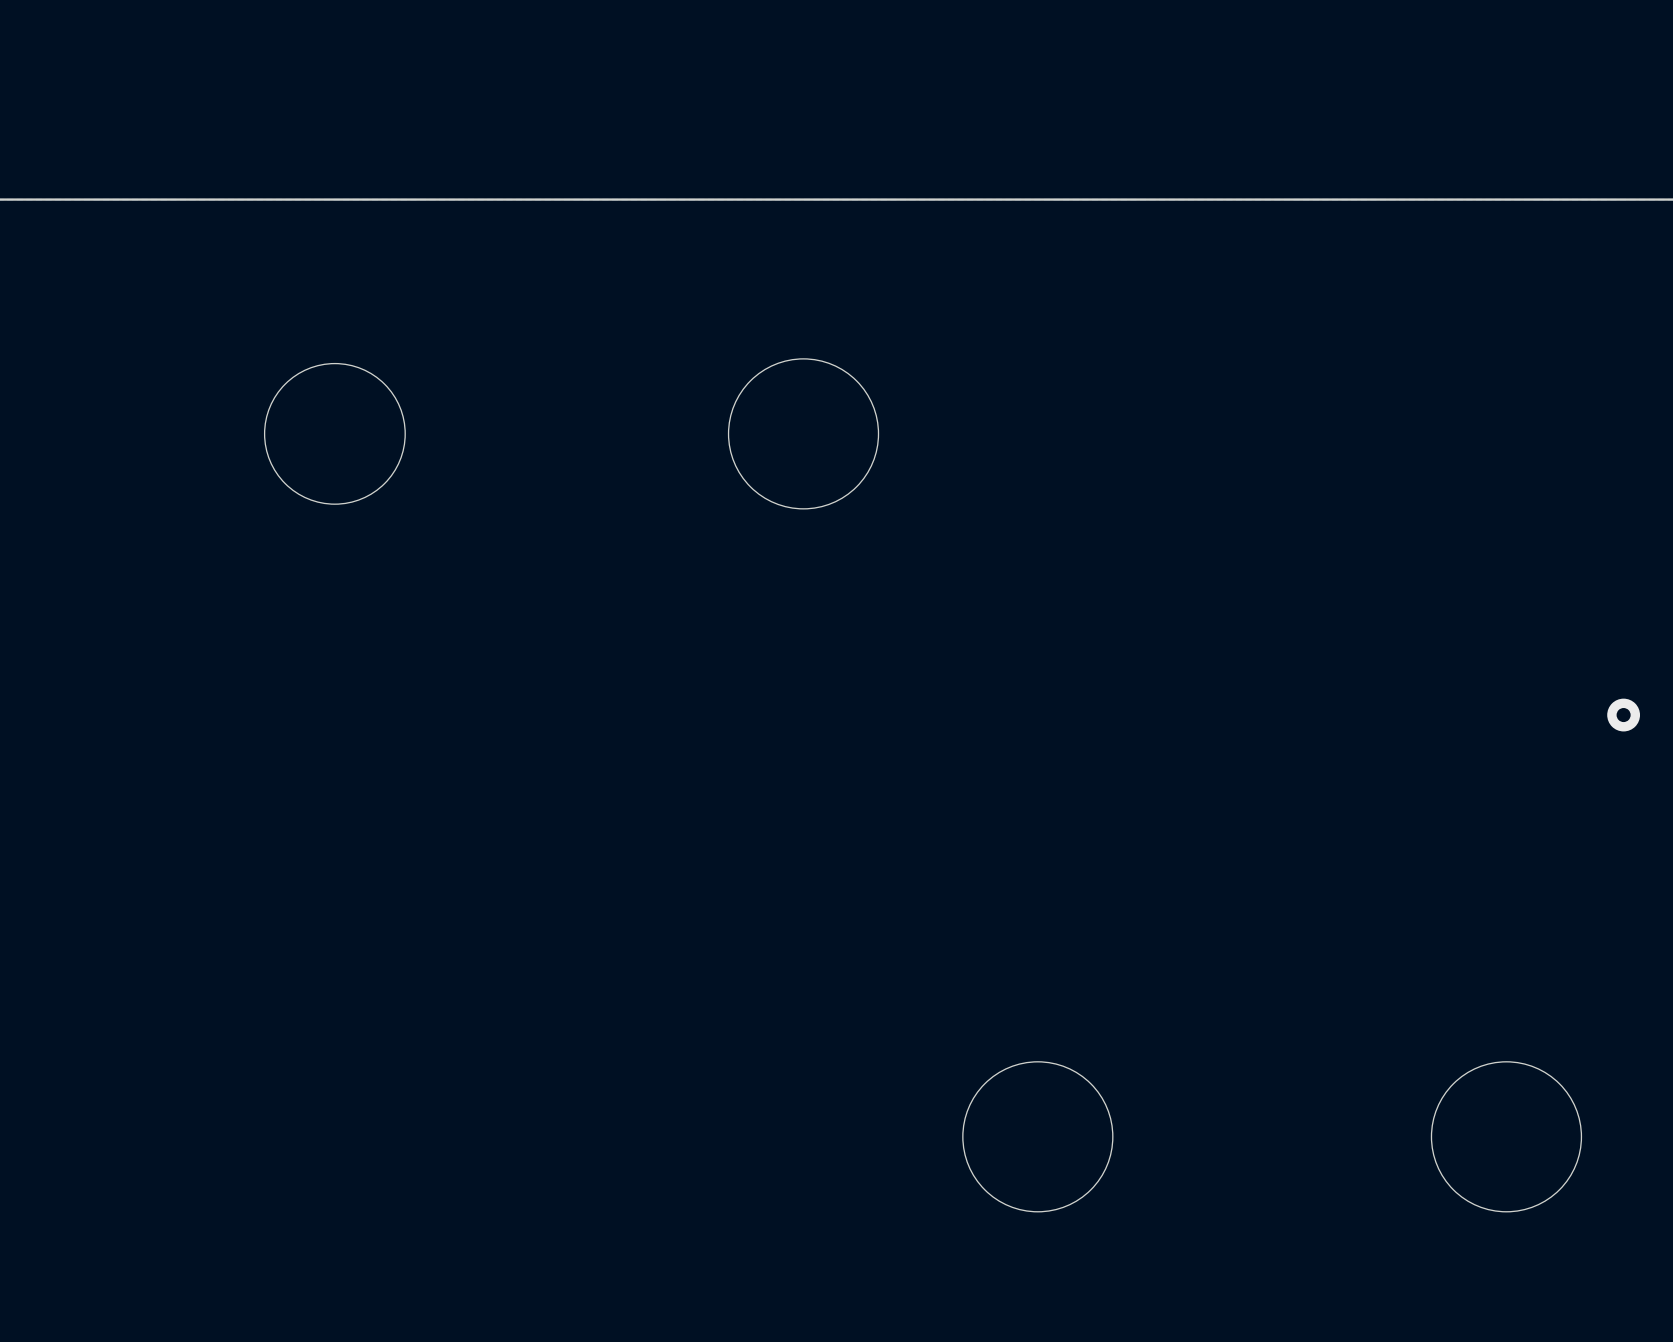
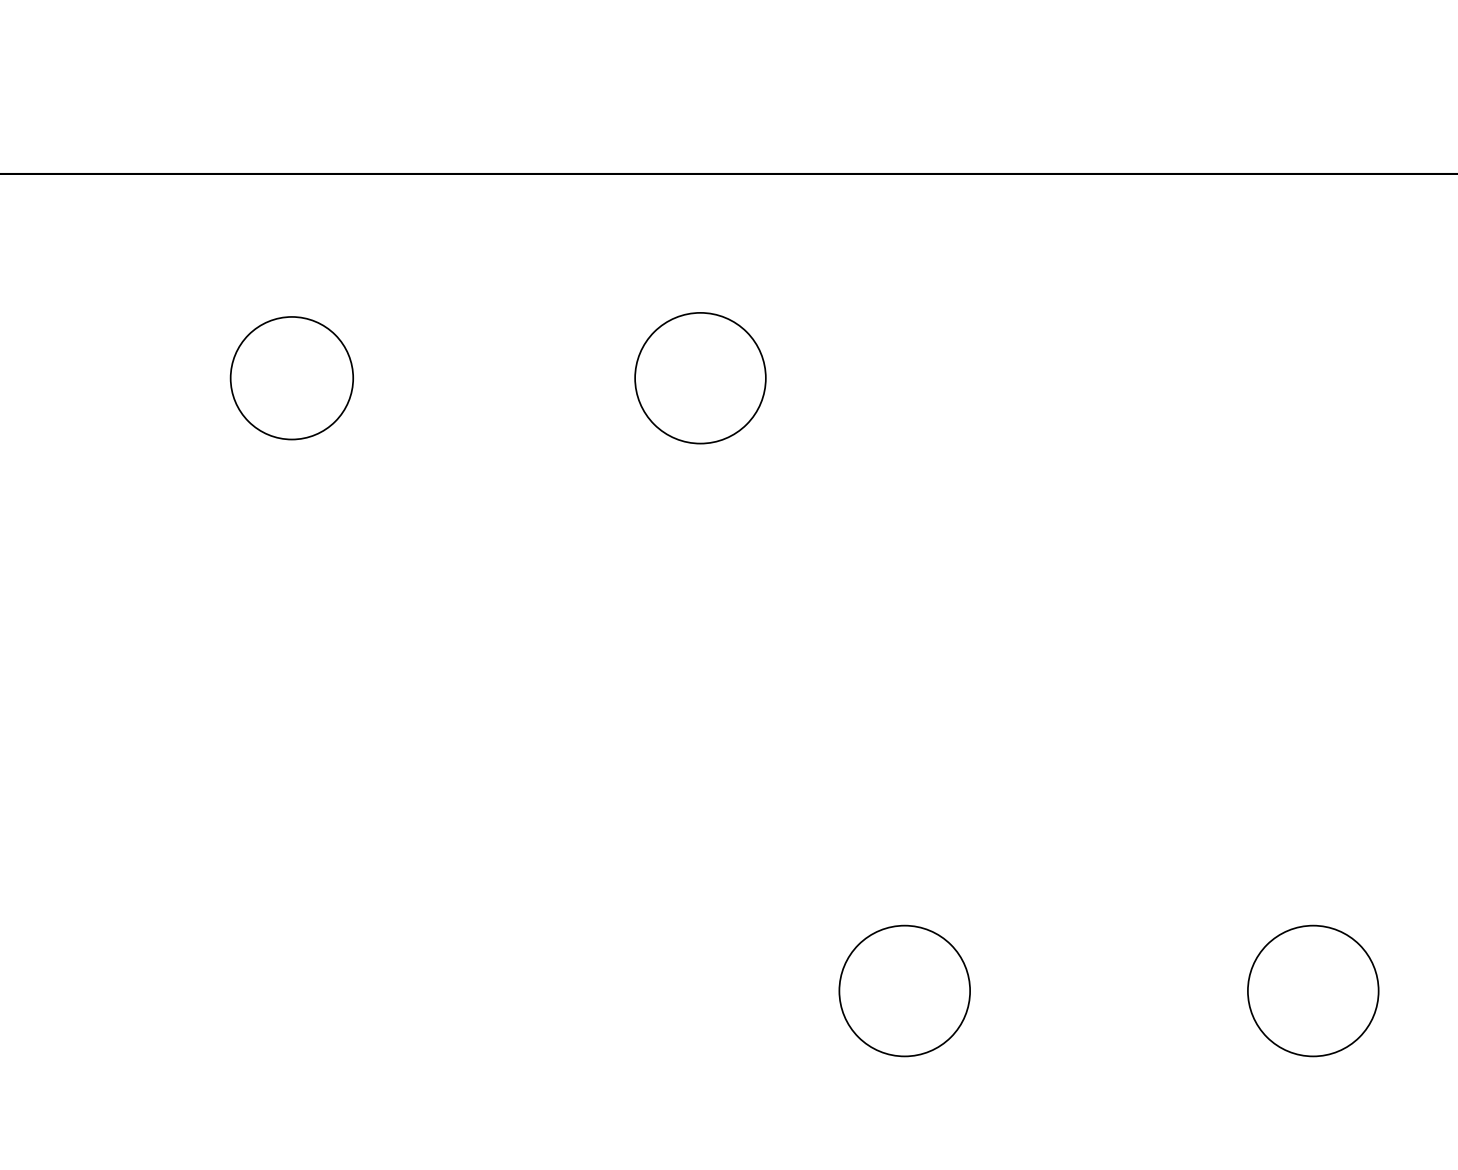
via: (1623, 715) -> none

